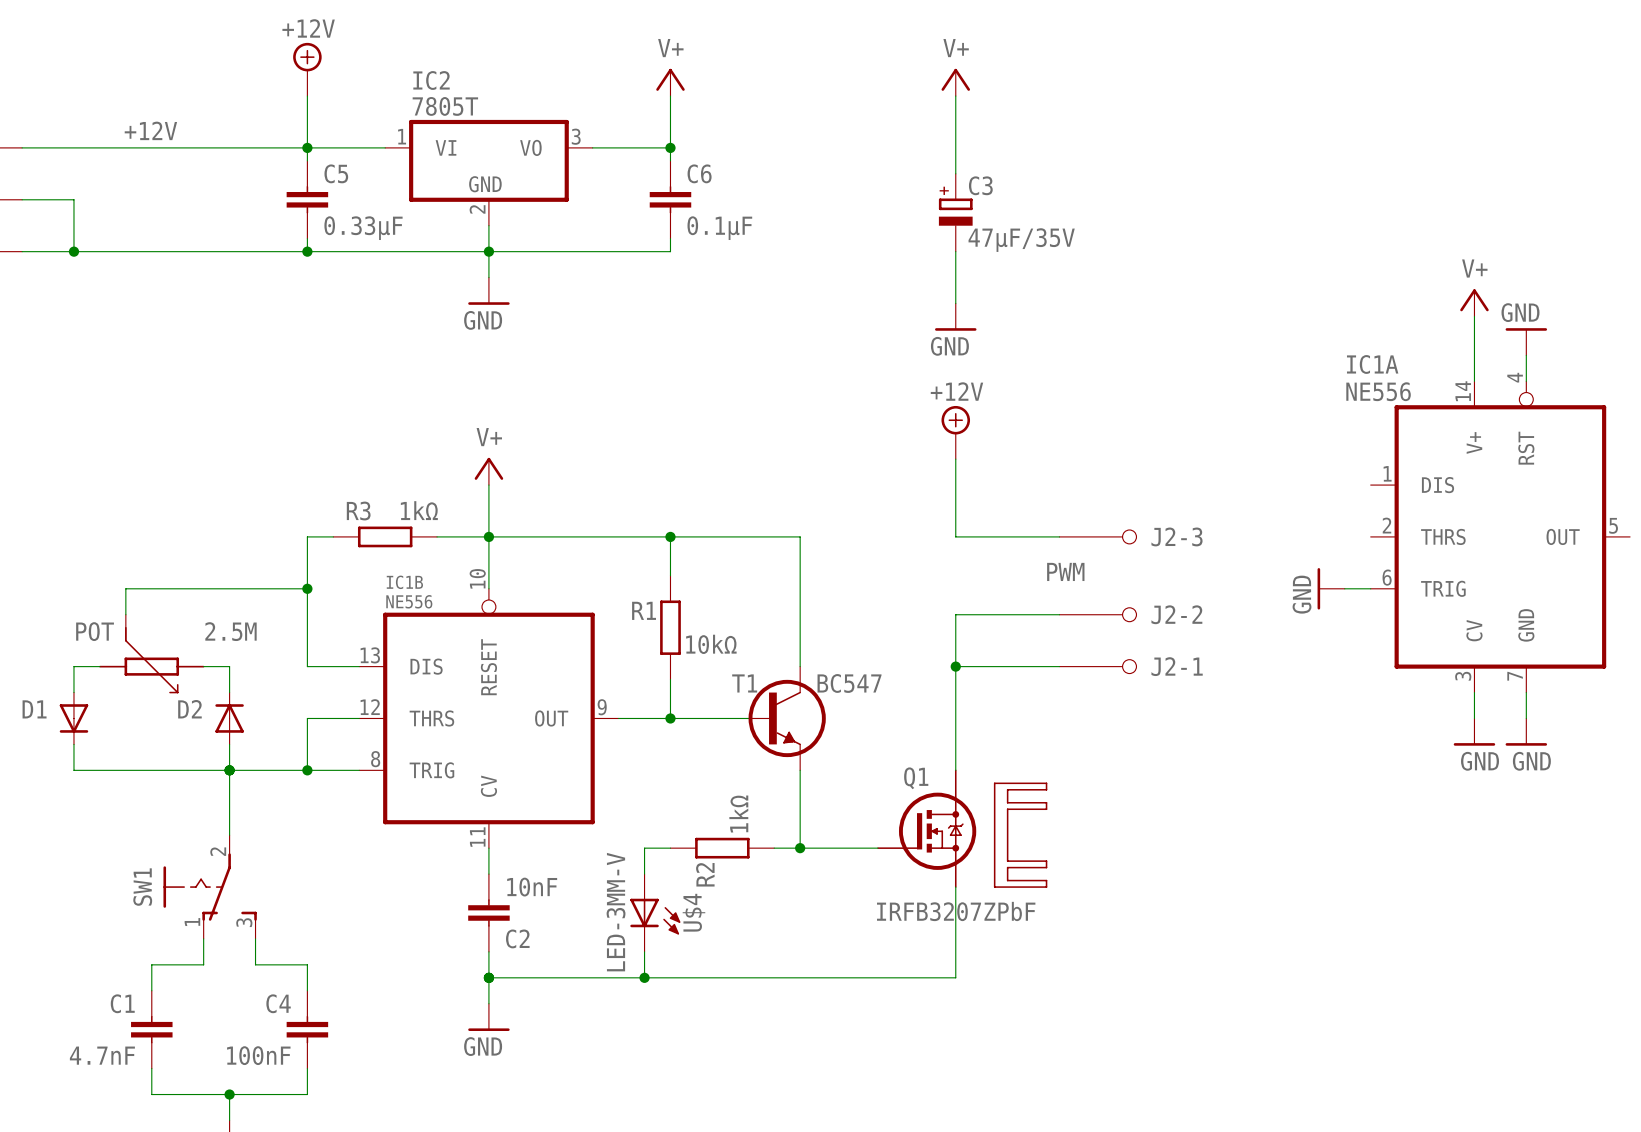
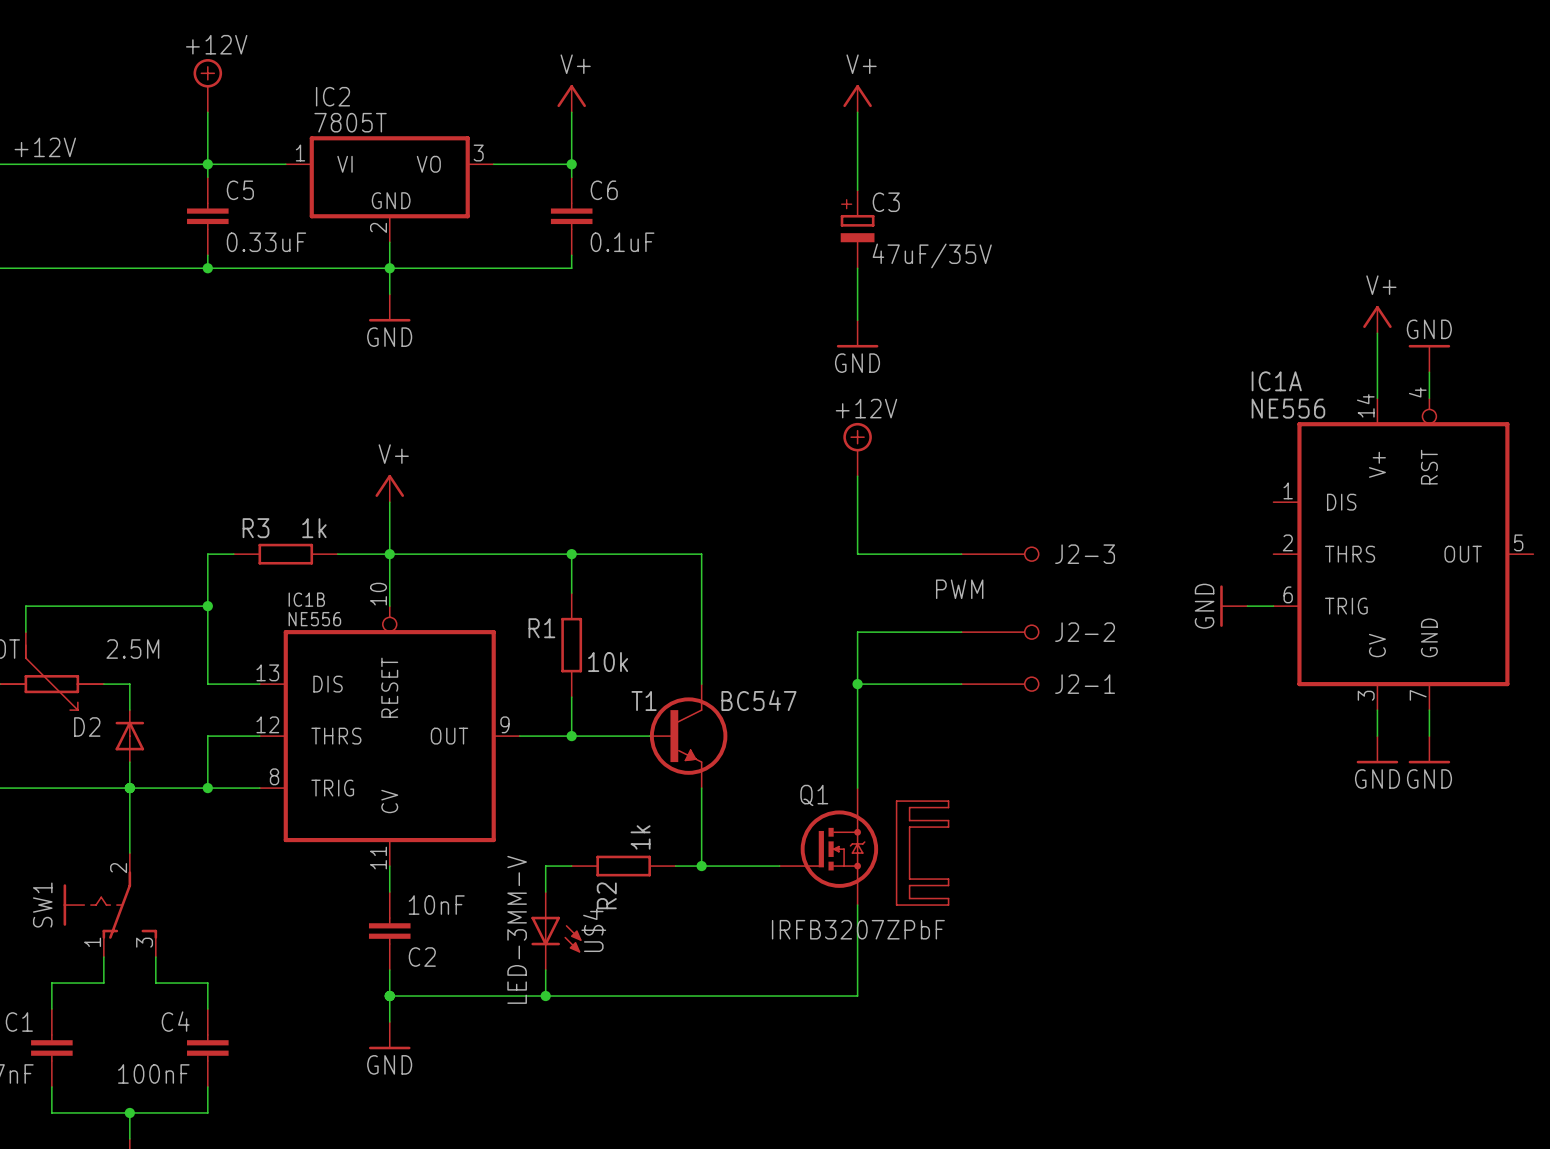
C5 value: 0.33μF (363, 228) -> 0.33uF (266, 242)
C6 value: 0.1μF (719, 228) -> 0.1uF (622, 242)
C3 value: 47μF/35V (1021, 240) -> 47uF/35V (932, 255)
R3 value: 1kΩ (419, 510) -> 1k (314, 528)
R1 value: 10kΩ (711, 644) -> 10k (608, 662)
R2 value: 1kΩ (738, 814) -> 1k (640, 837)

